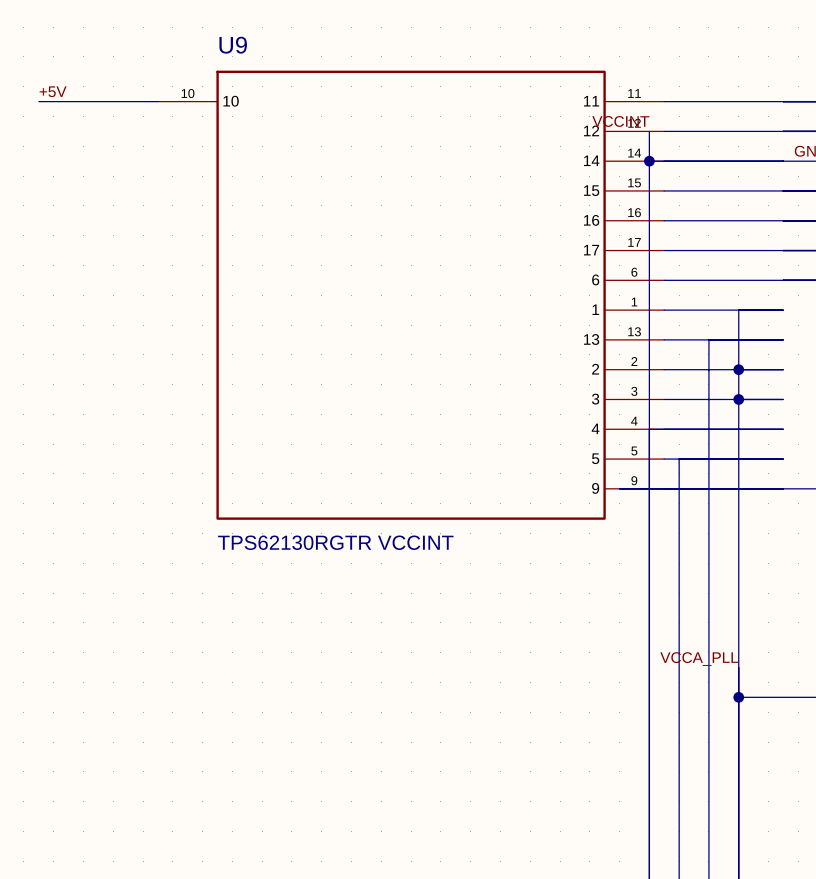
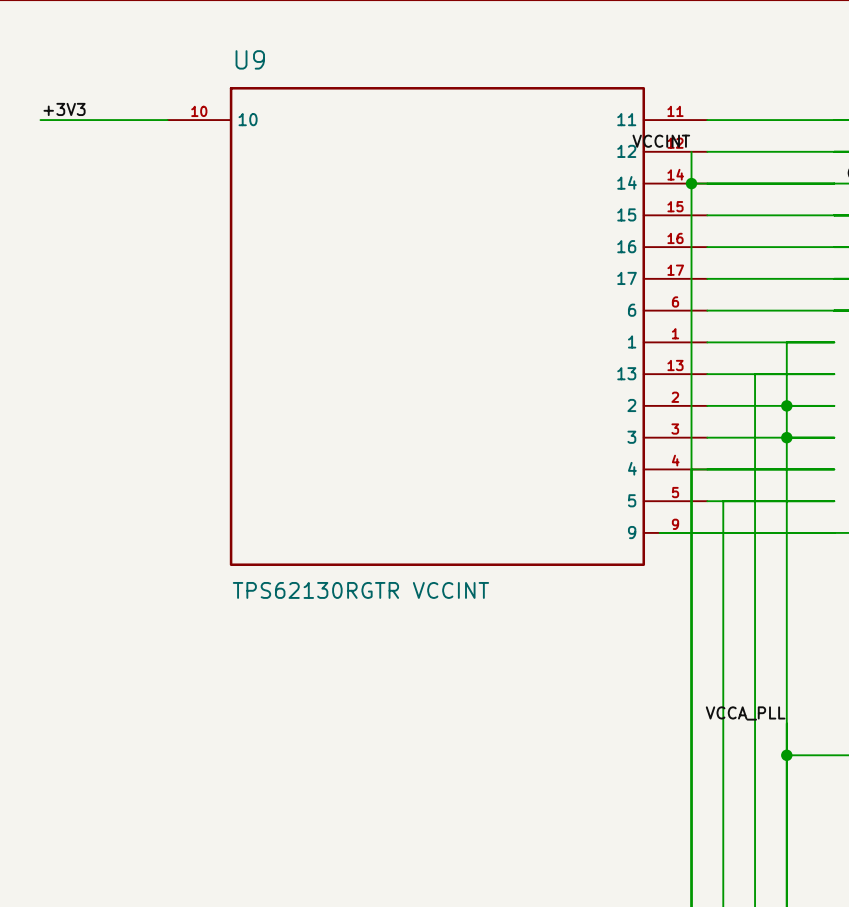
label: +5V (53, 91) -> +3V3 (64, 109)

